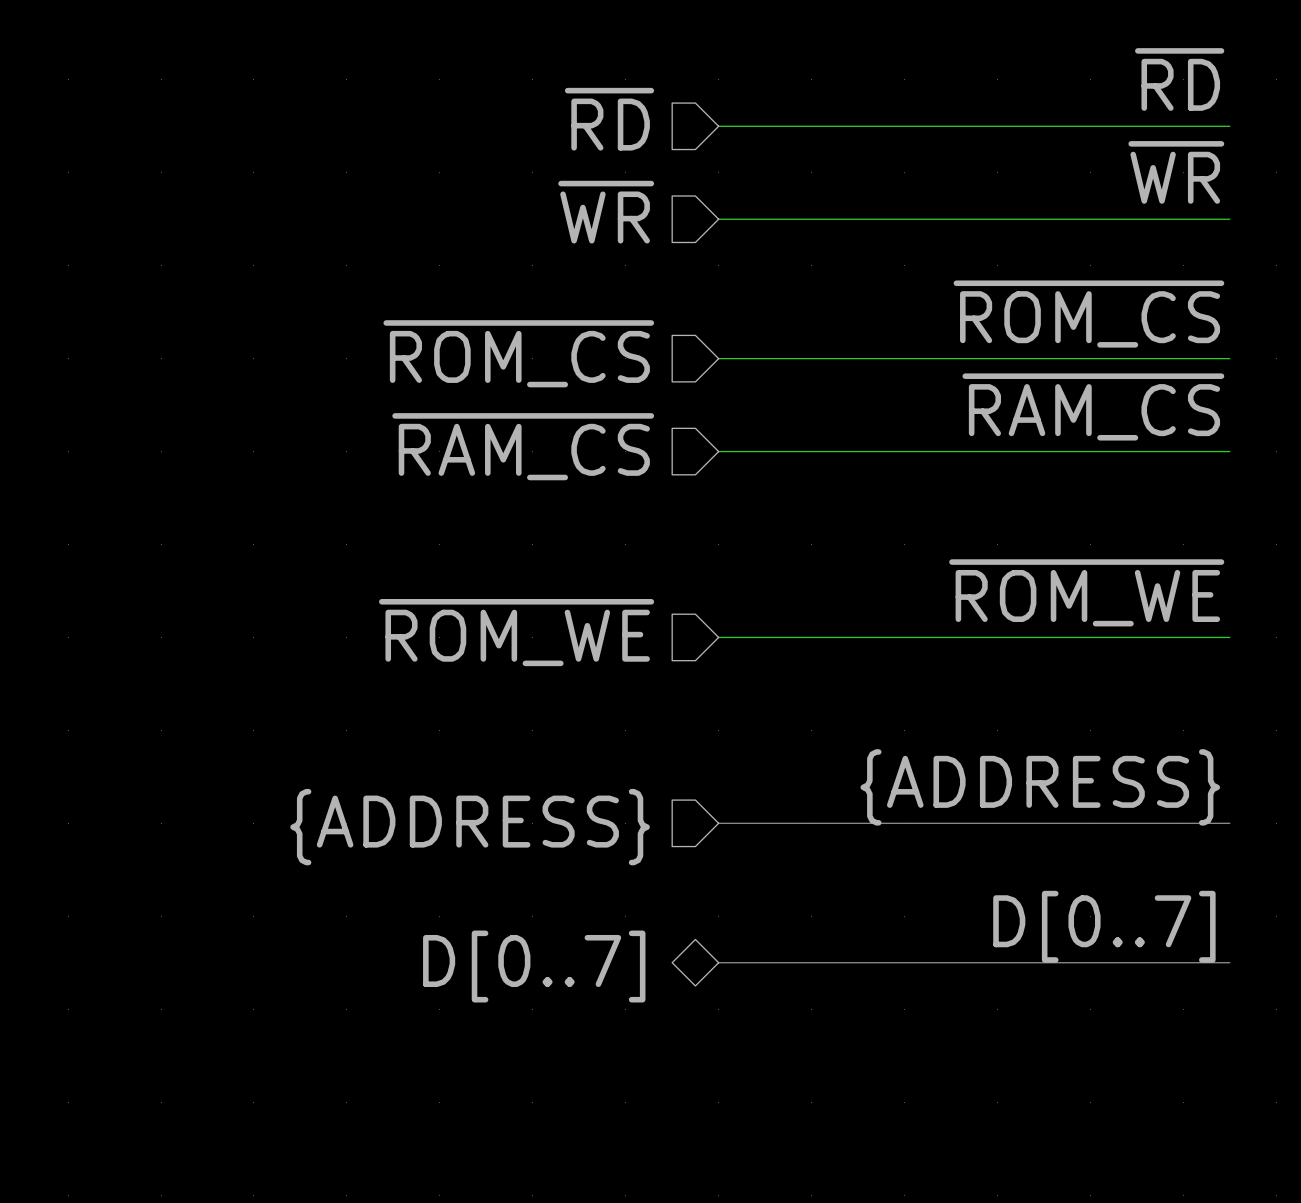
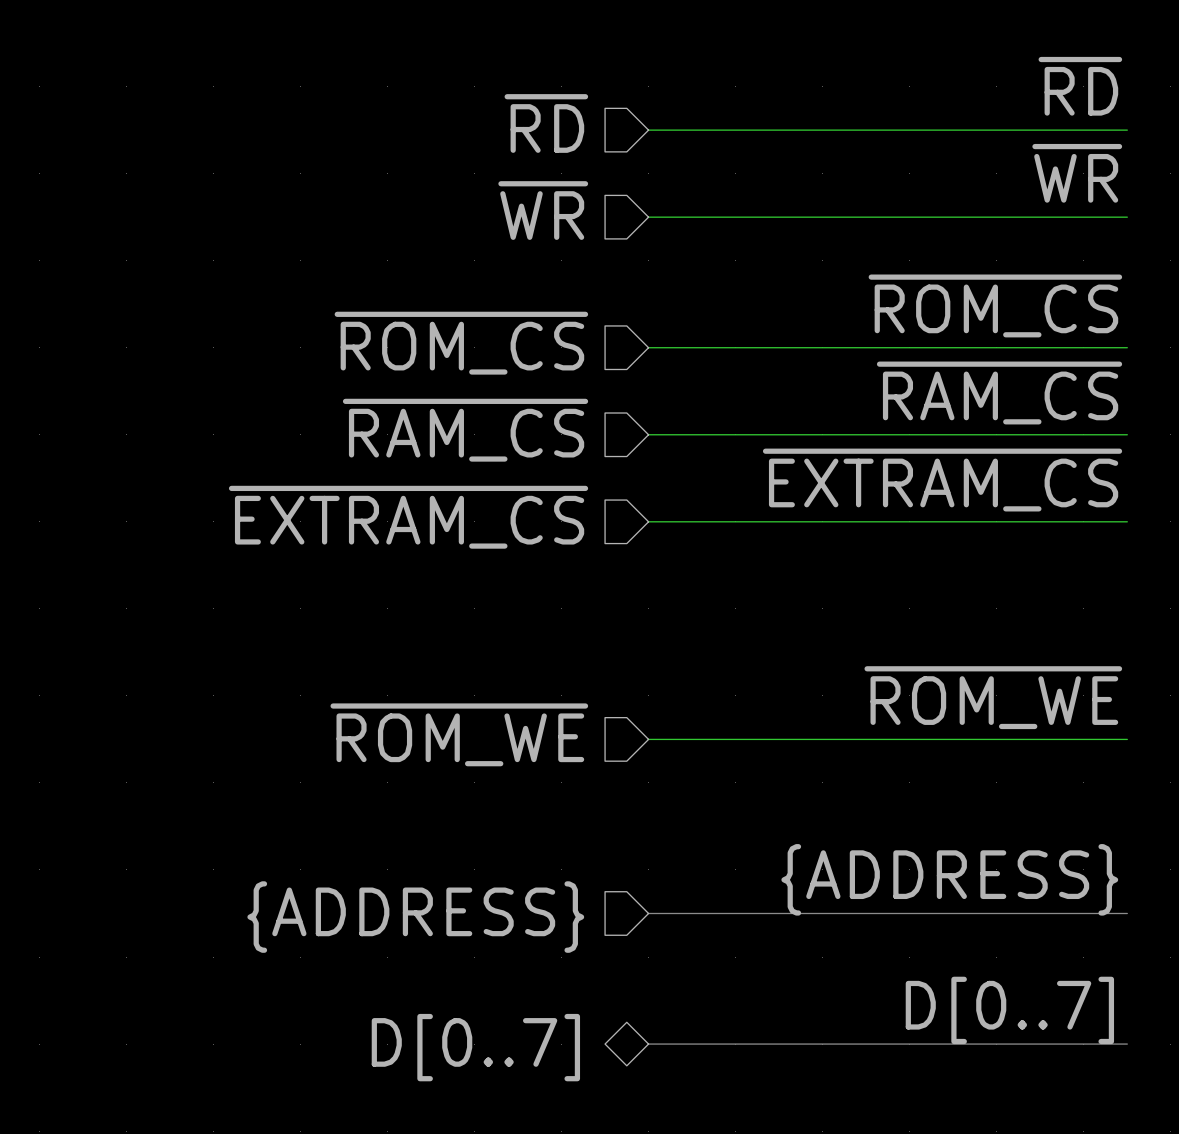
label: none -> ~{EXTRAM_CS} (942, 480)
hierarchical label: none -> ~{EXTRAM_CS} (408, 517)
label position: ~{ROM_WE} (1086, 592) -> ~{ROM_WE} (993, 697)
hierarchical label position: ~{ROM_WE} (516, 632) -> ~{ROM_WE} (459, 734)
wire: (718, 637) (1229, 637) -> (648, 521) (1127, 521)
wire: none -> (648, 739) (1127, 739)
label: {ADDRESS} (1040, 787) -> none
bus: (718, 823) (1229, 823) -> (648, 1044) (1127, 1044)
hierarchical label: {ADDRESS} (470, 827) -> none
label: D[0..7] (1104, 926) -> {ADDRESS} (949, 879)
hierarchical label shape: bidirectional (534, 966) -> input (415, 917)
hierarchical label: D[0..7] (534, 966) -> {ADDRESS} (415, 917)
label: none -> D[0..7] (1009, 1010)
hierarchical label: none -> D[0..7] (475, 1047)

